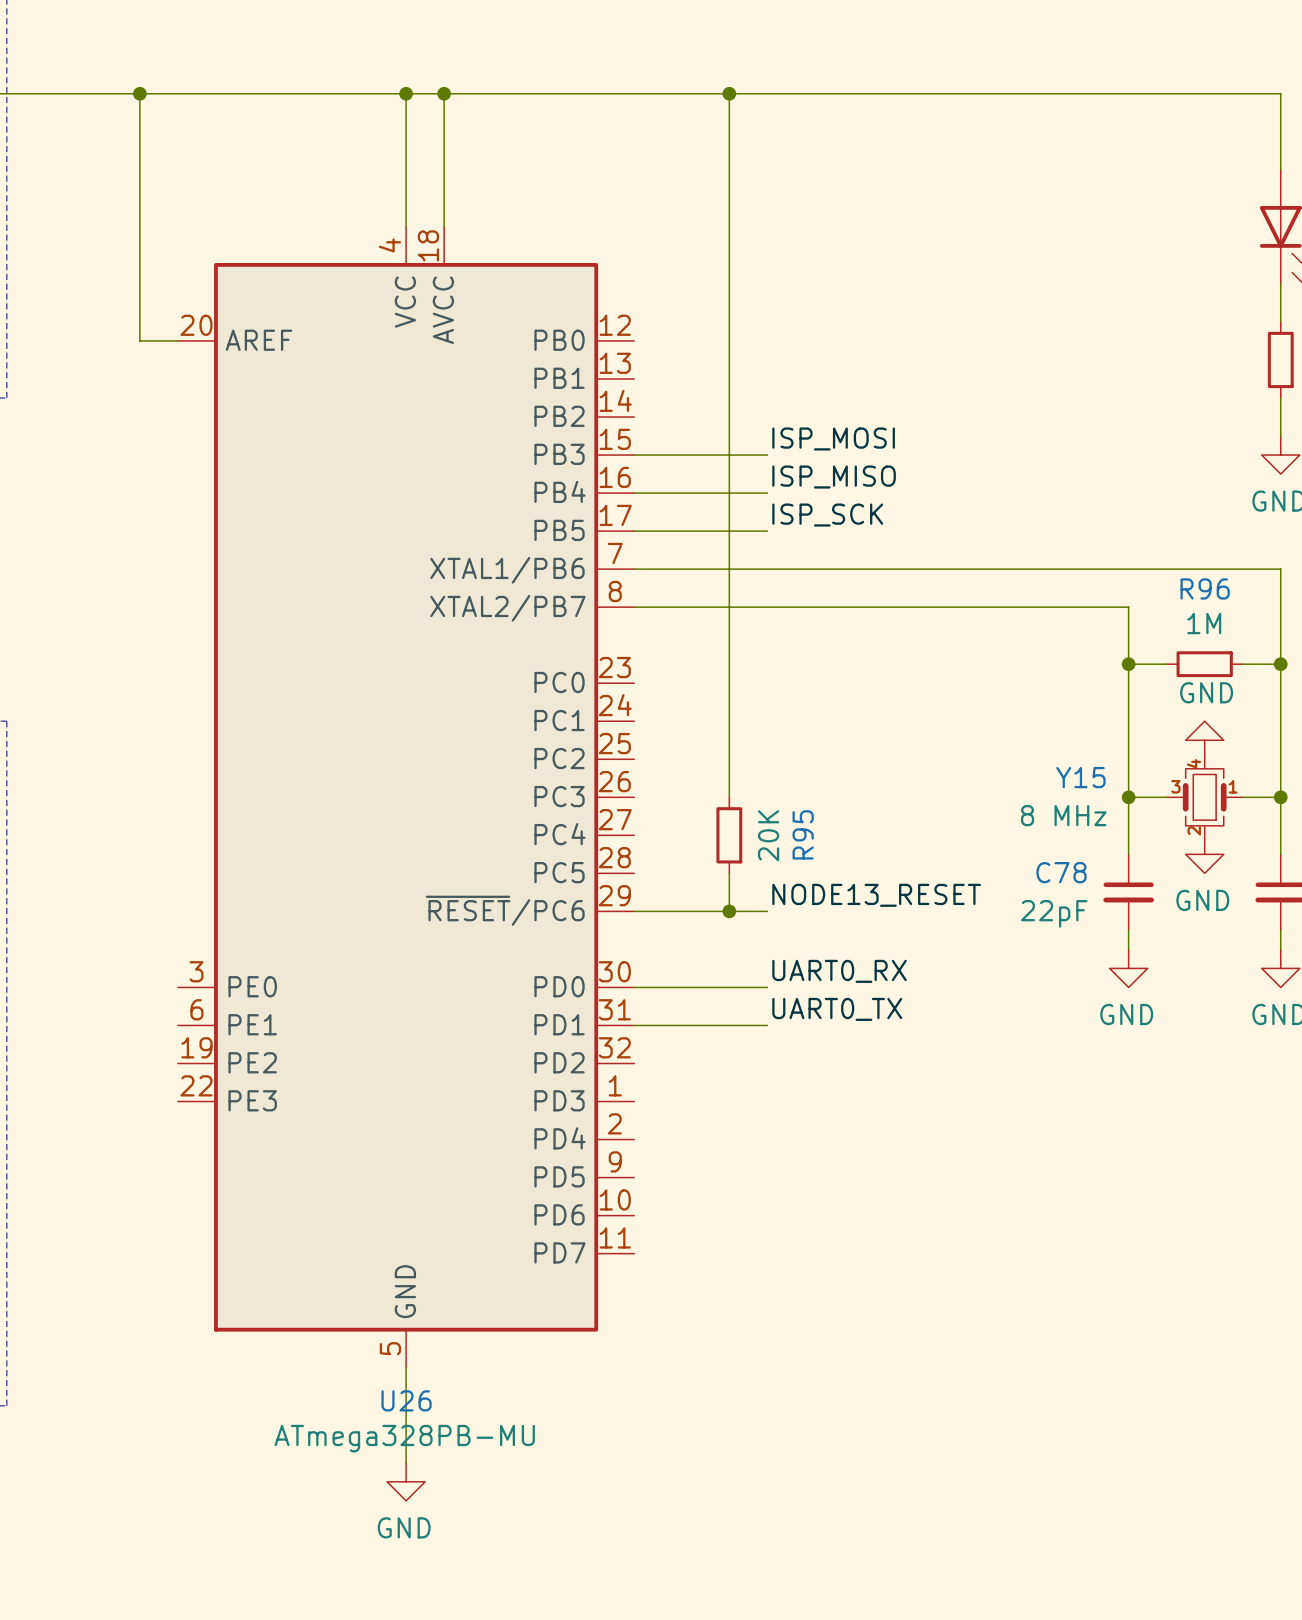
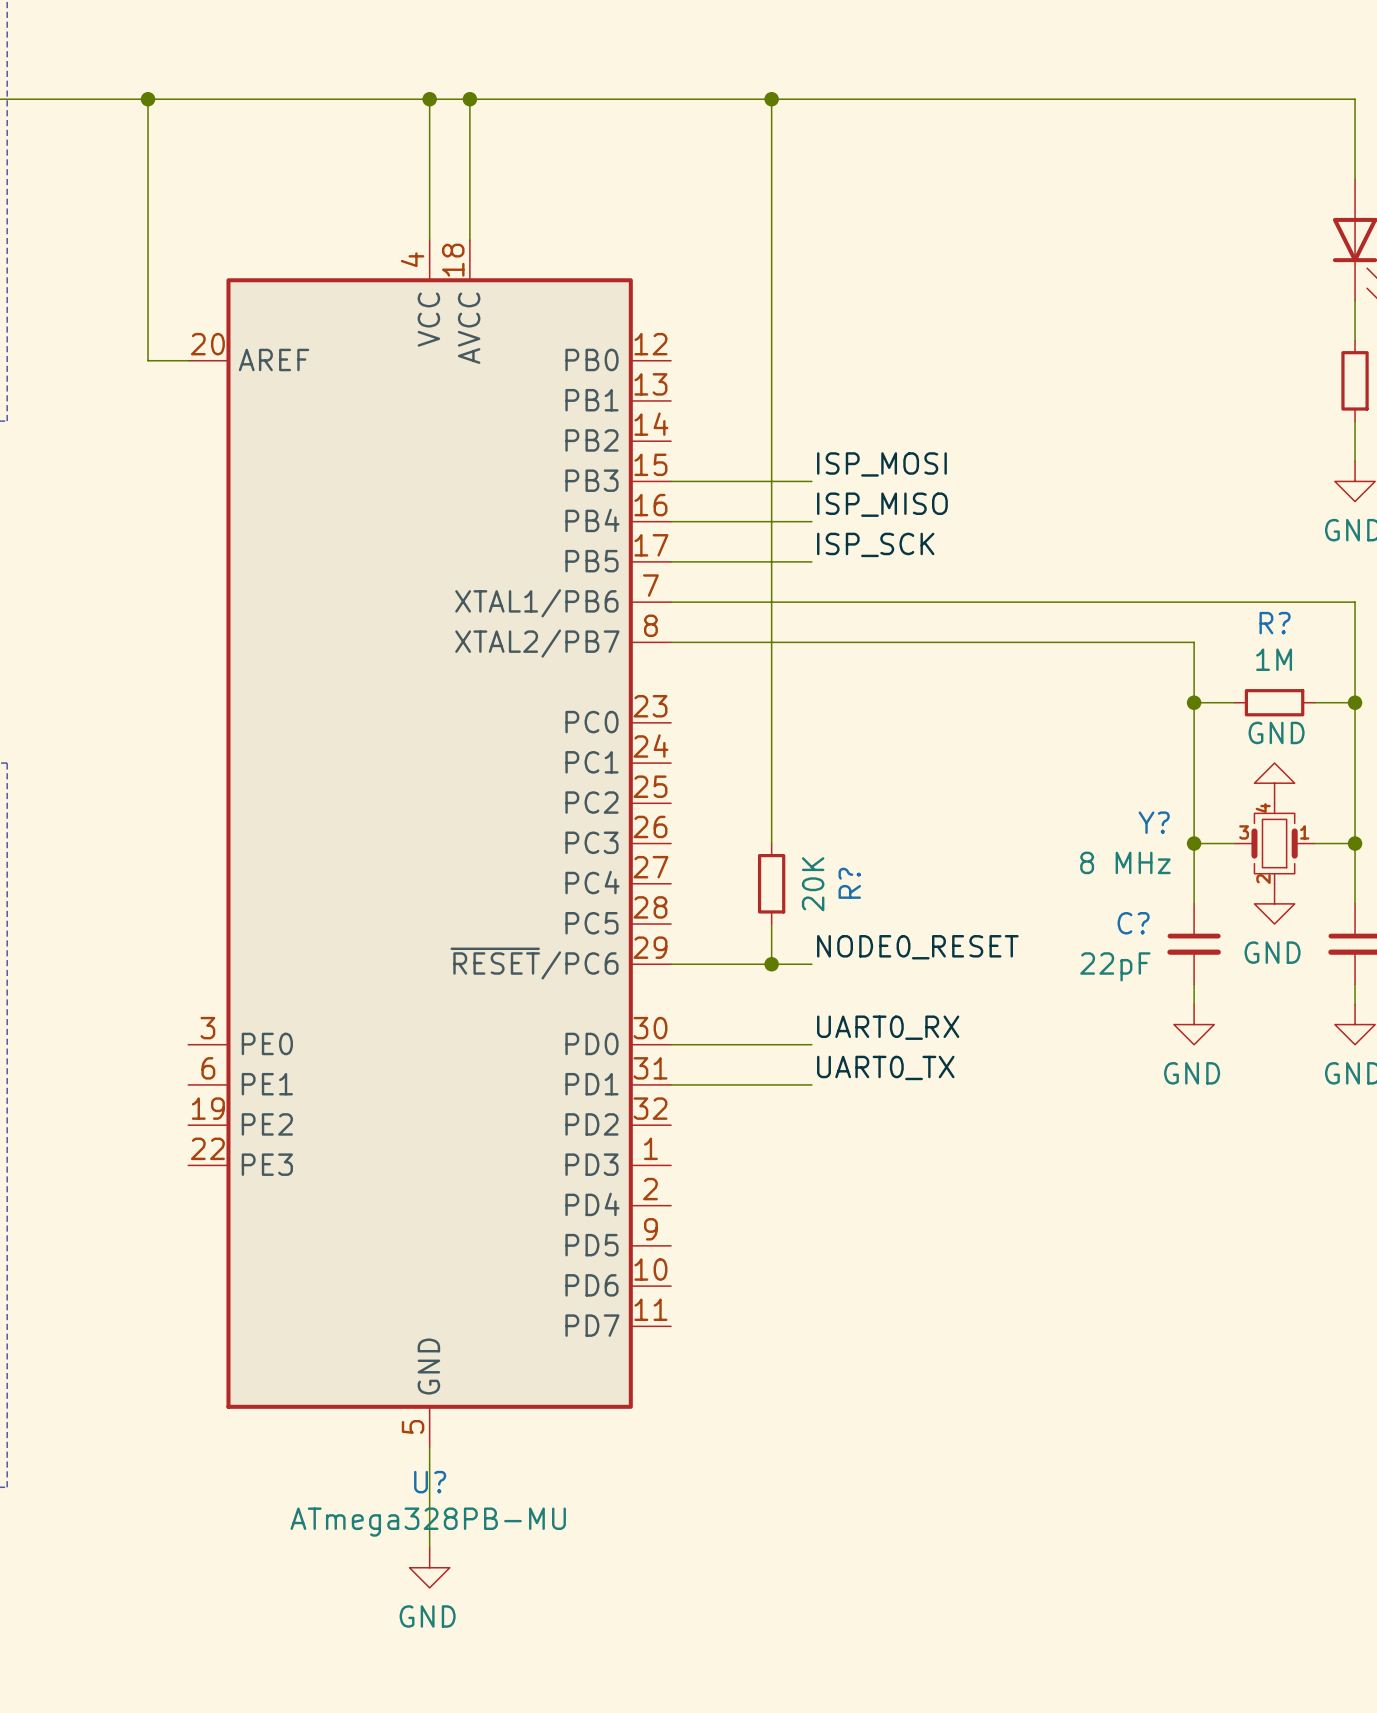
R96 name: R96 (1205, 588) -> R? (1275, 623)
Y15 name: Y15 (1080, 777) -> Y? (1154, 822)
R95 name: R95 (803, 834) -> R? (849, 883)
C78 name: C78 (1061, 872) -> C? (1133, 923)
label: NODE13_RESET (876, 895) -> NODE0_RESET (917, 947)
U26 name: U26 (406, 1400) -> U? (430, 1482)

